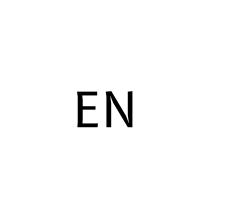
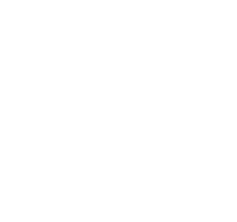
label: EN (104, 109) -> none

